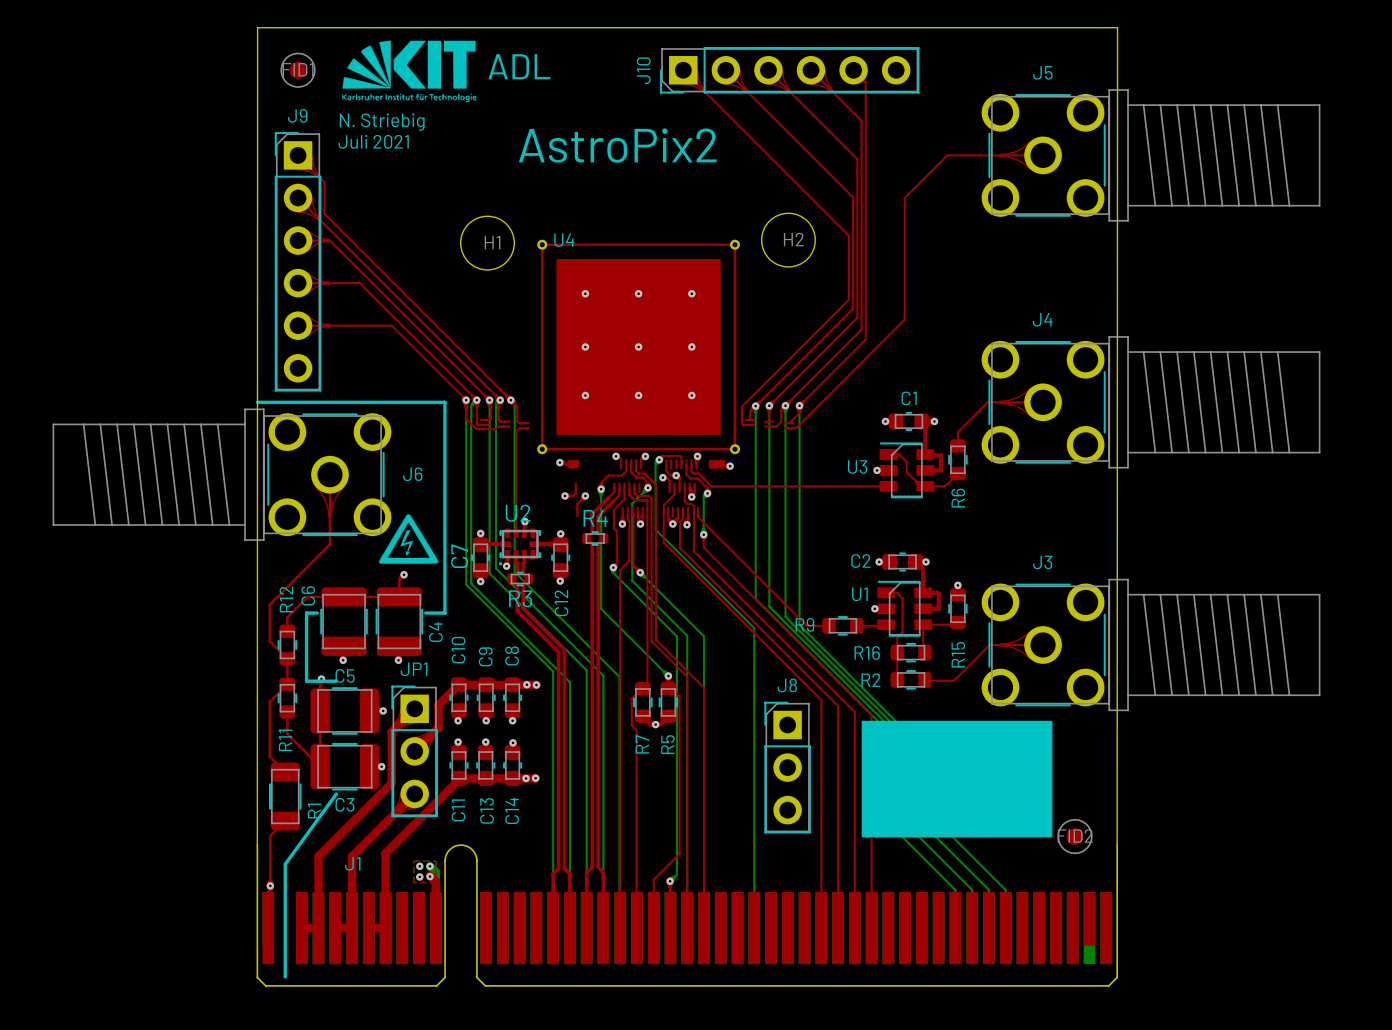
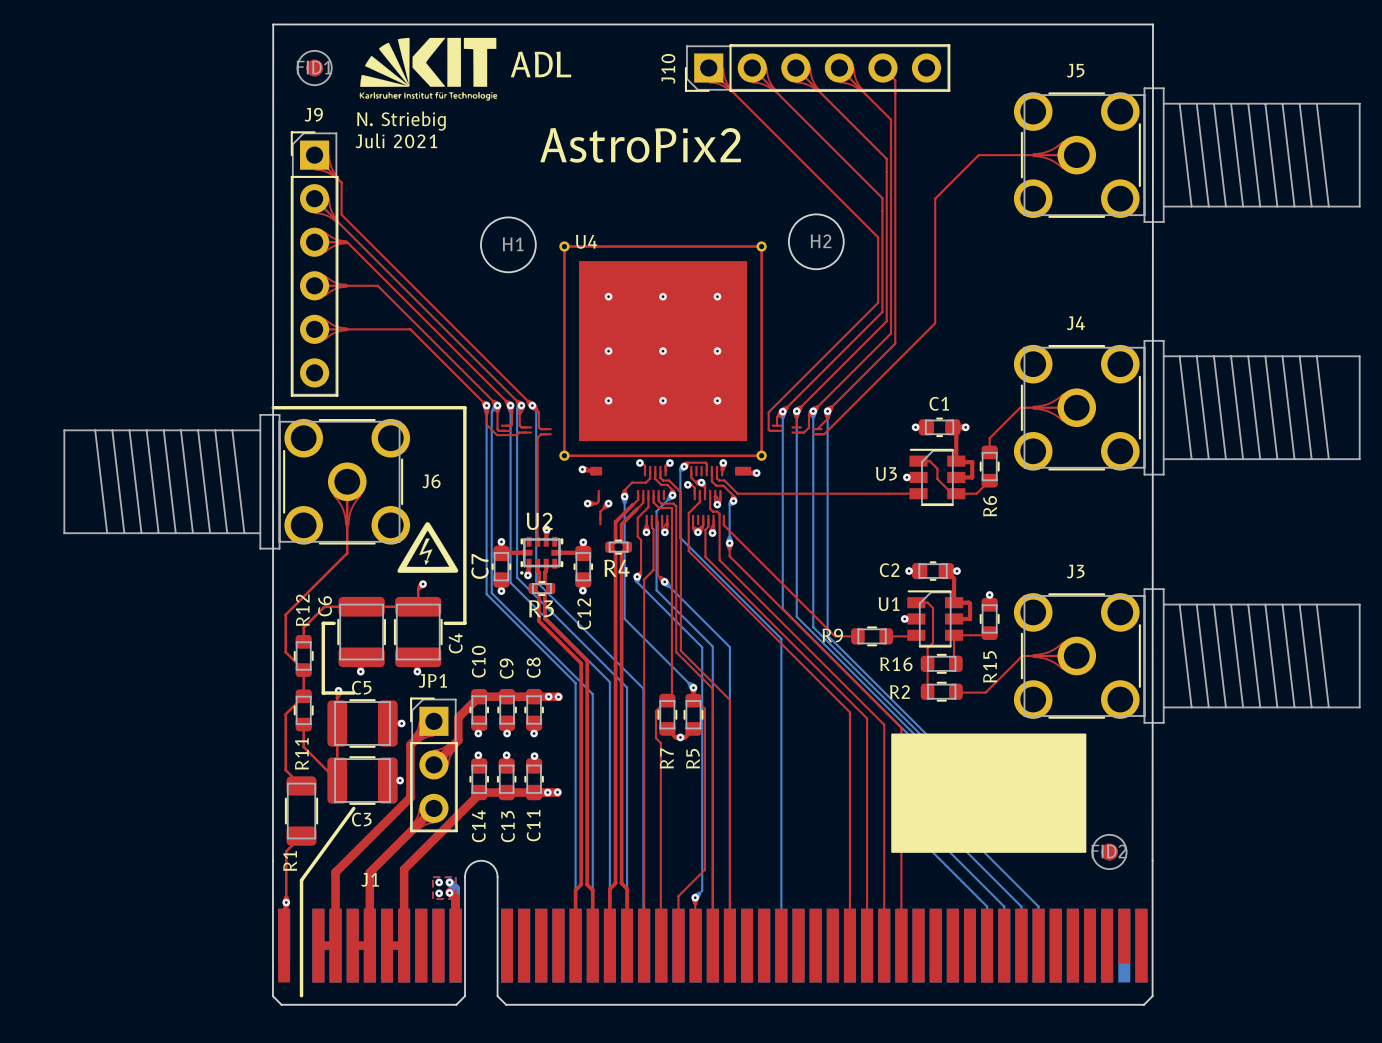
R4 name position: R4 (595, 518) -> R4 (617, 568)
J8: (787, 767) -> none
R1 name position: R1 (314, 810) -> R1 (290, 861)
C11 name: C11 (458, 810) -> C14 (478, 826)
C14 name: C14 (512, 810) -> C11 (533, 825)

